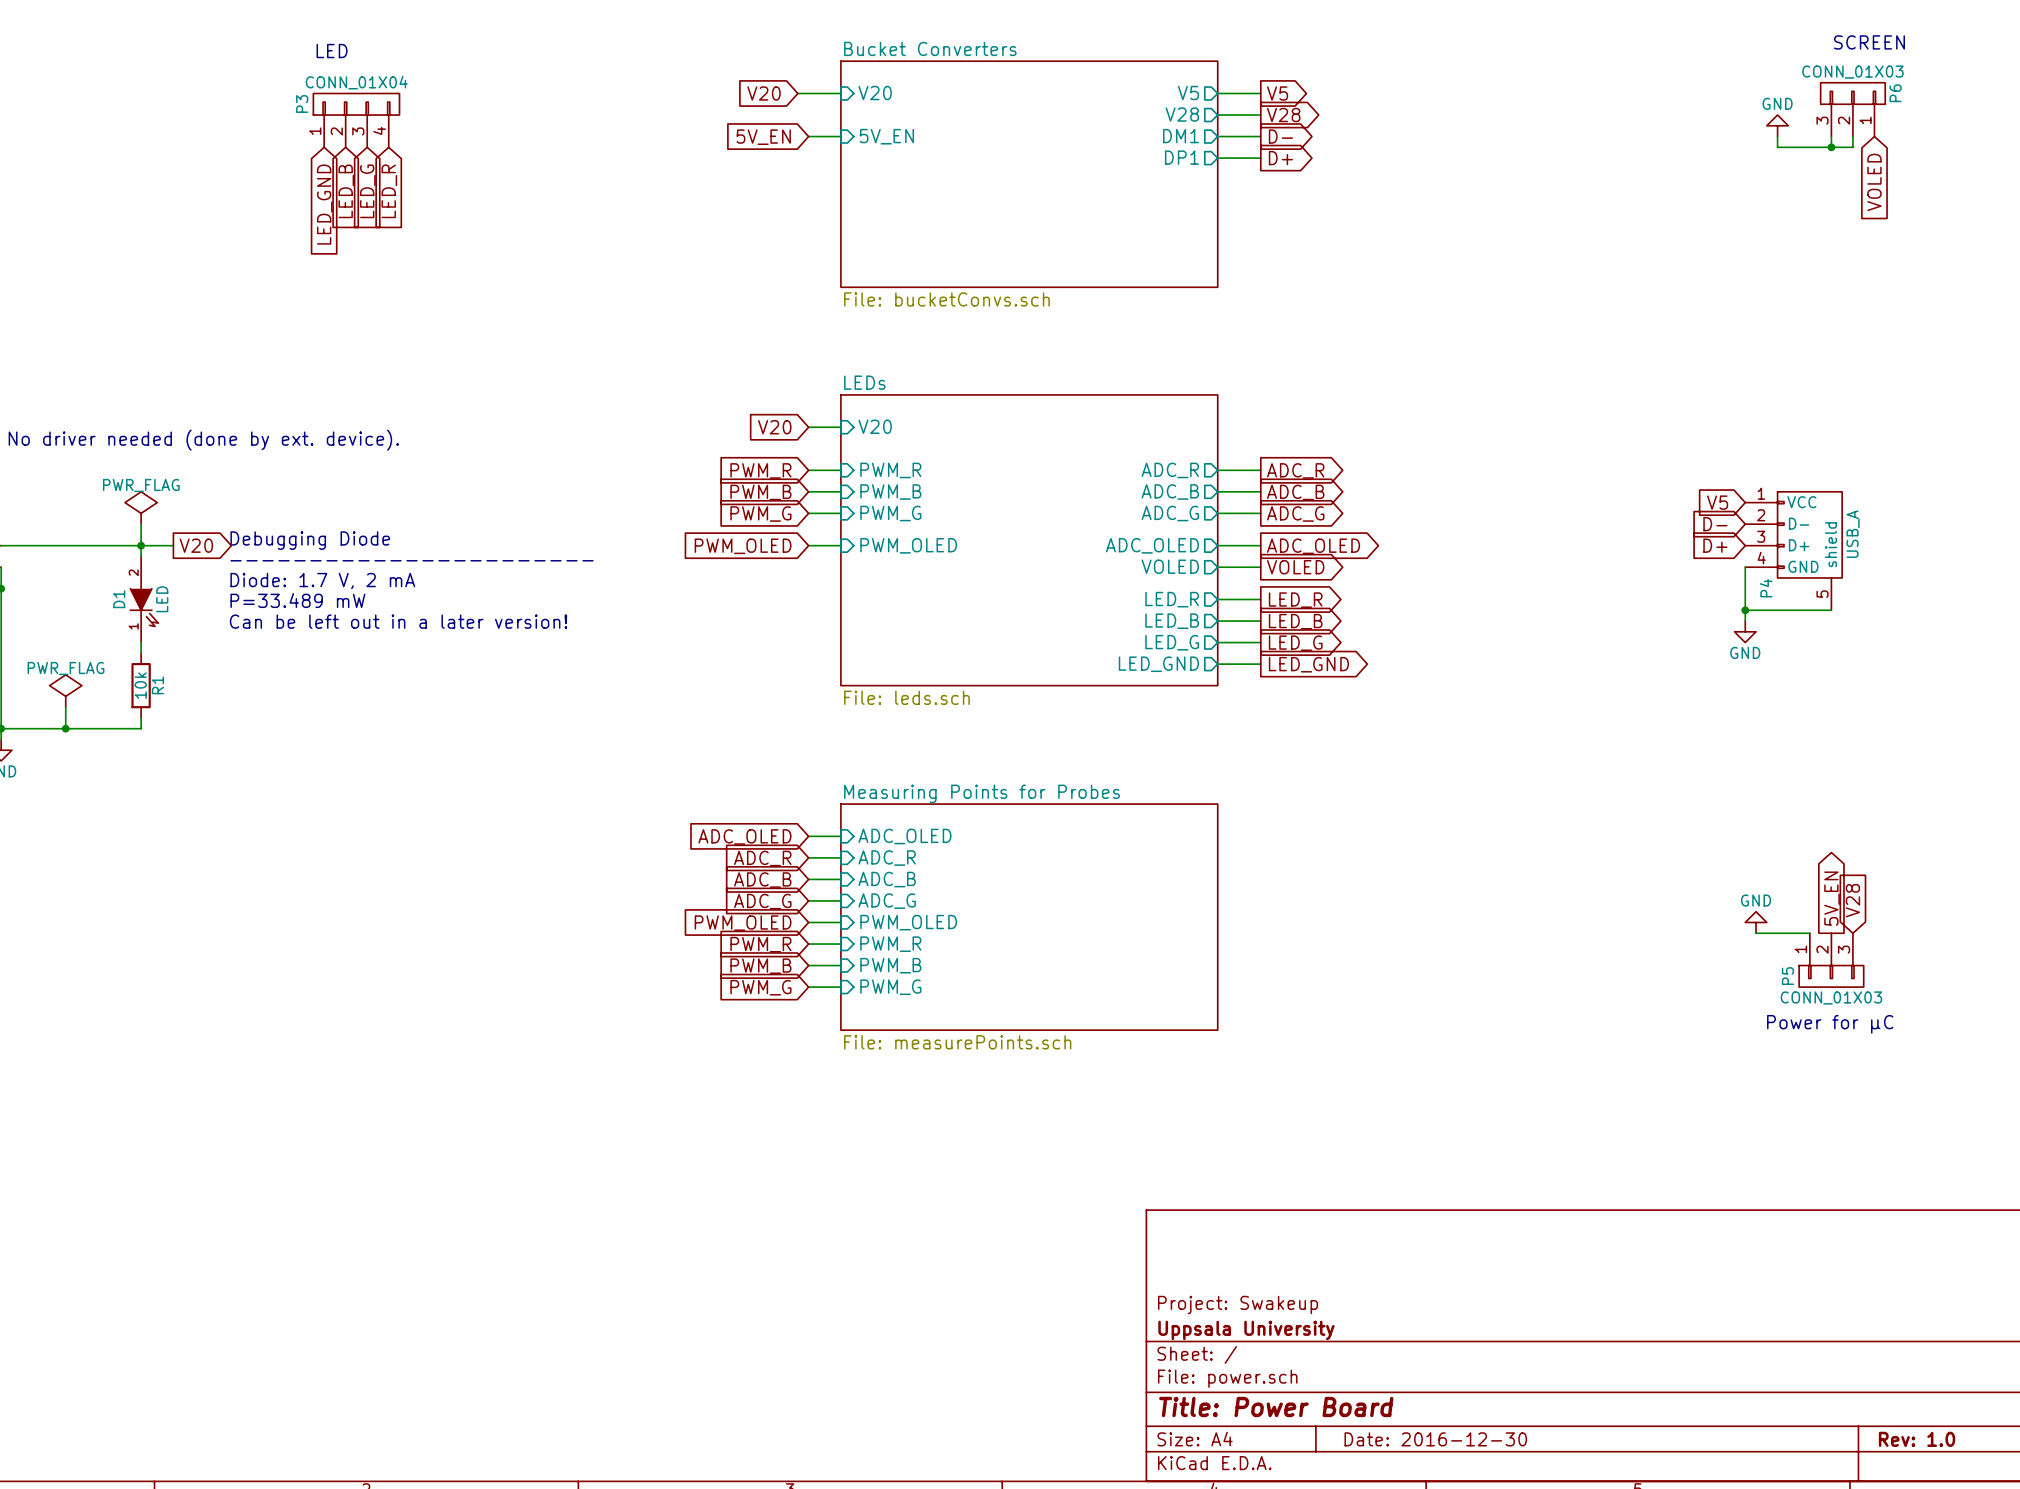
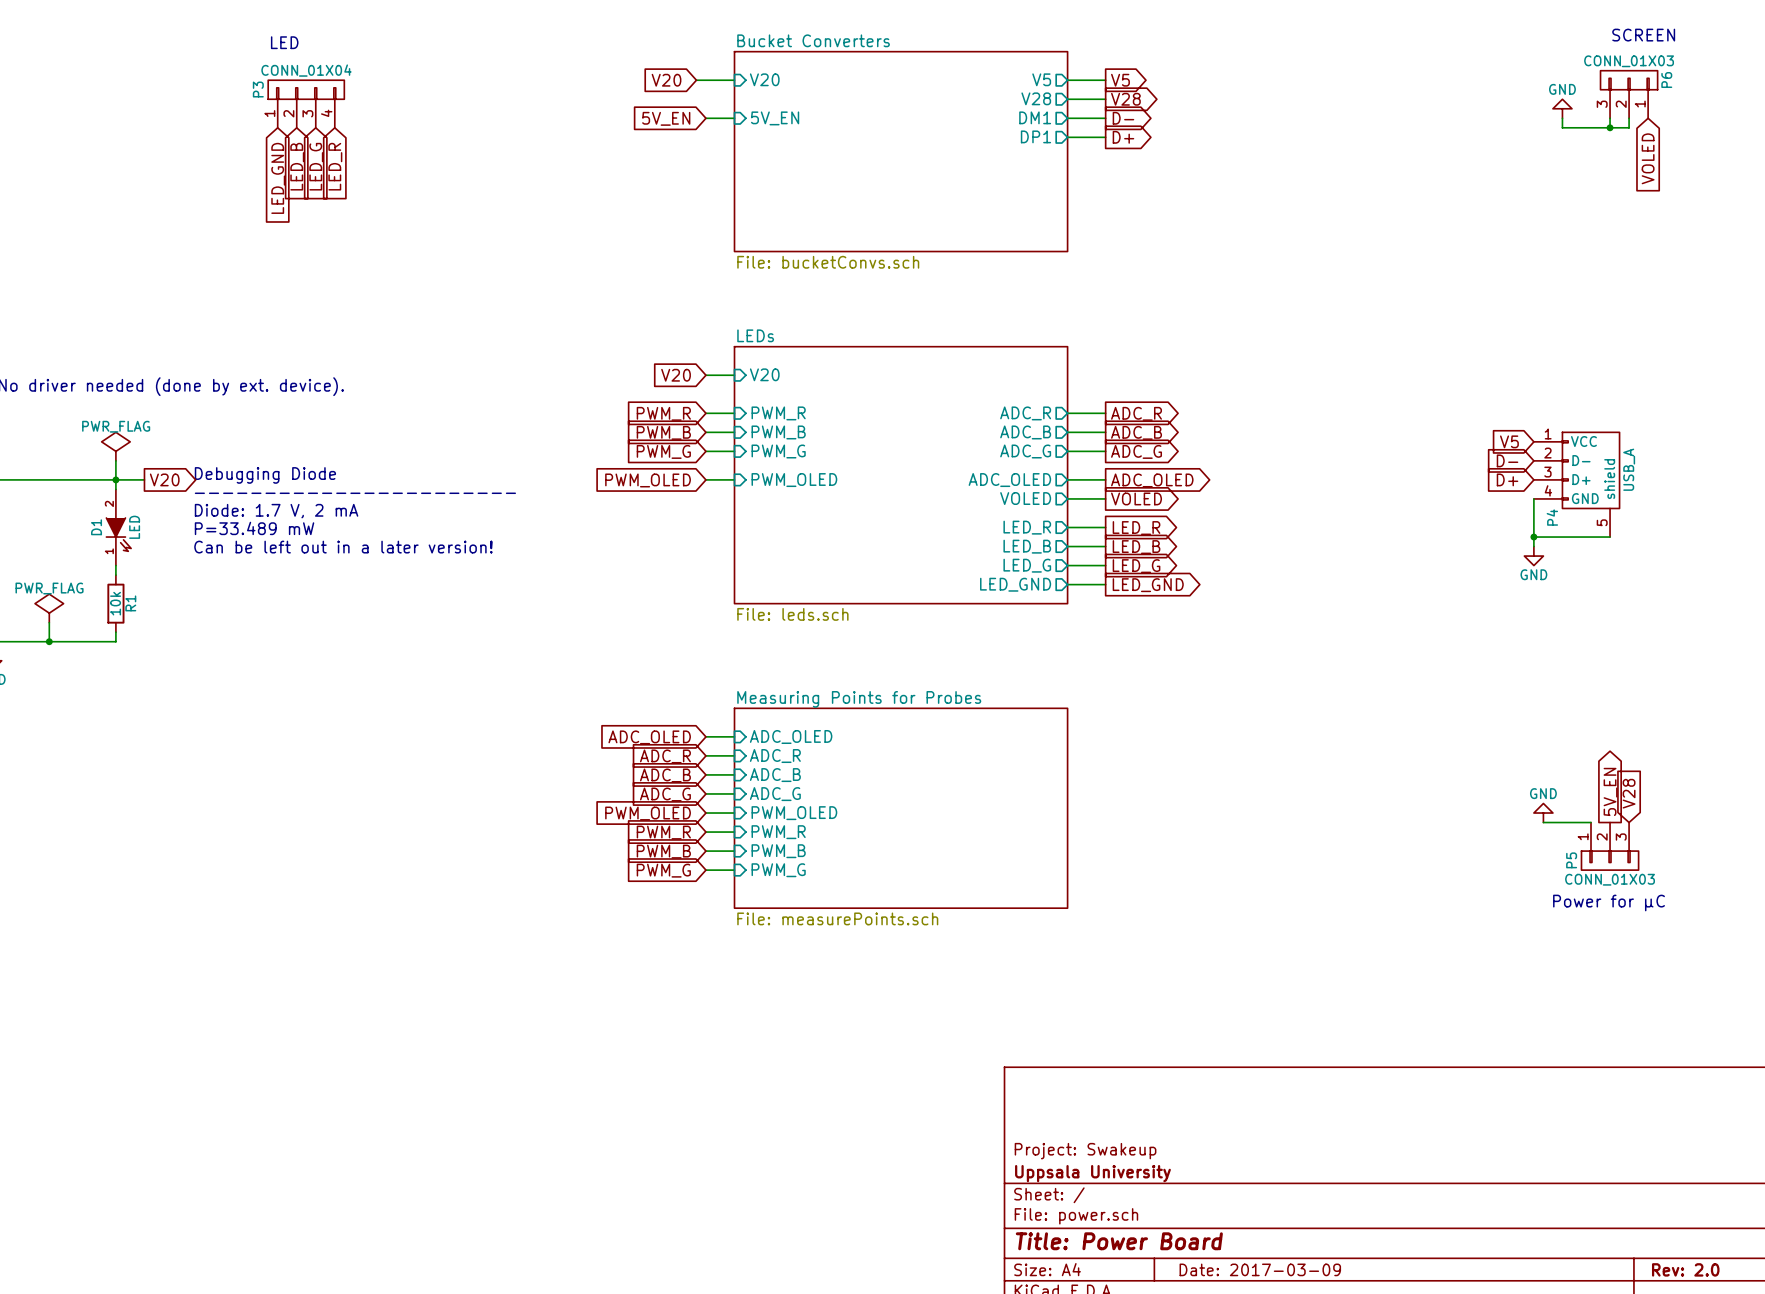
title block: Date: 2016-12-30 (1435, 1439) -> Date: 2017-03-09 (1260, 1269)
title block: Rev: 1.0 (1917, 1439) -> Rev: 2.0 (1685, 1269)

